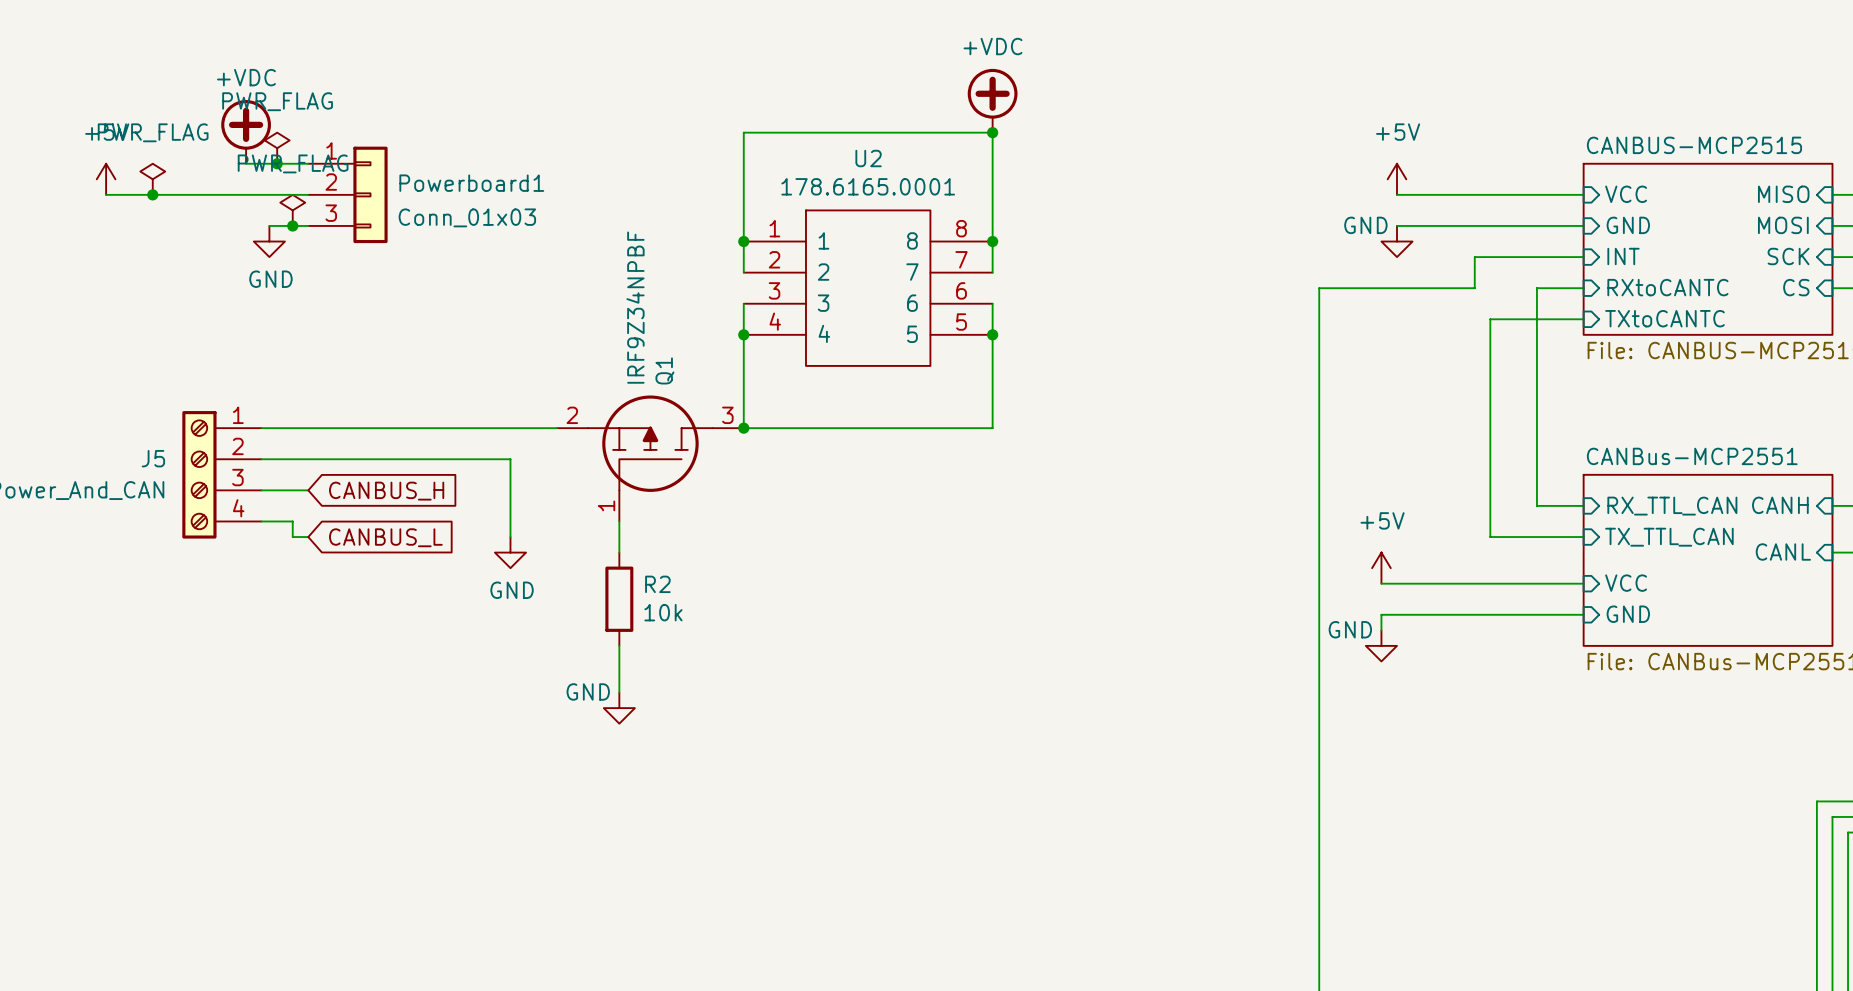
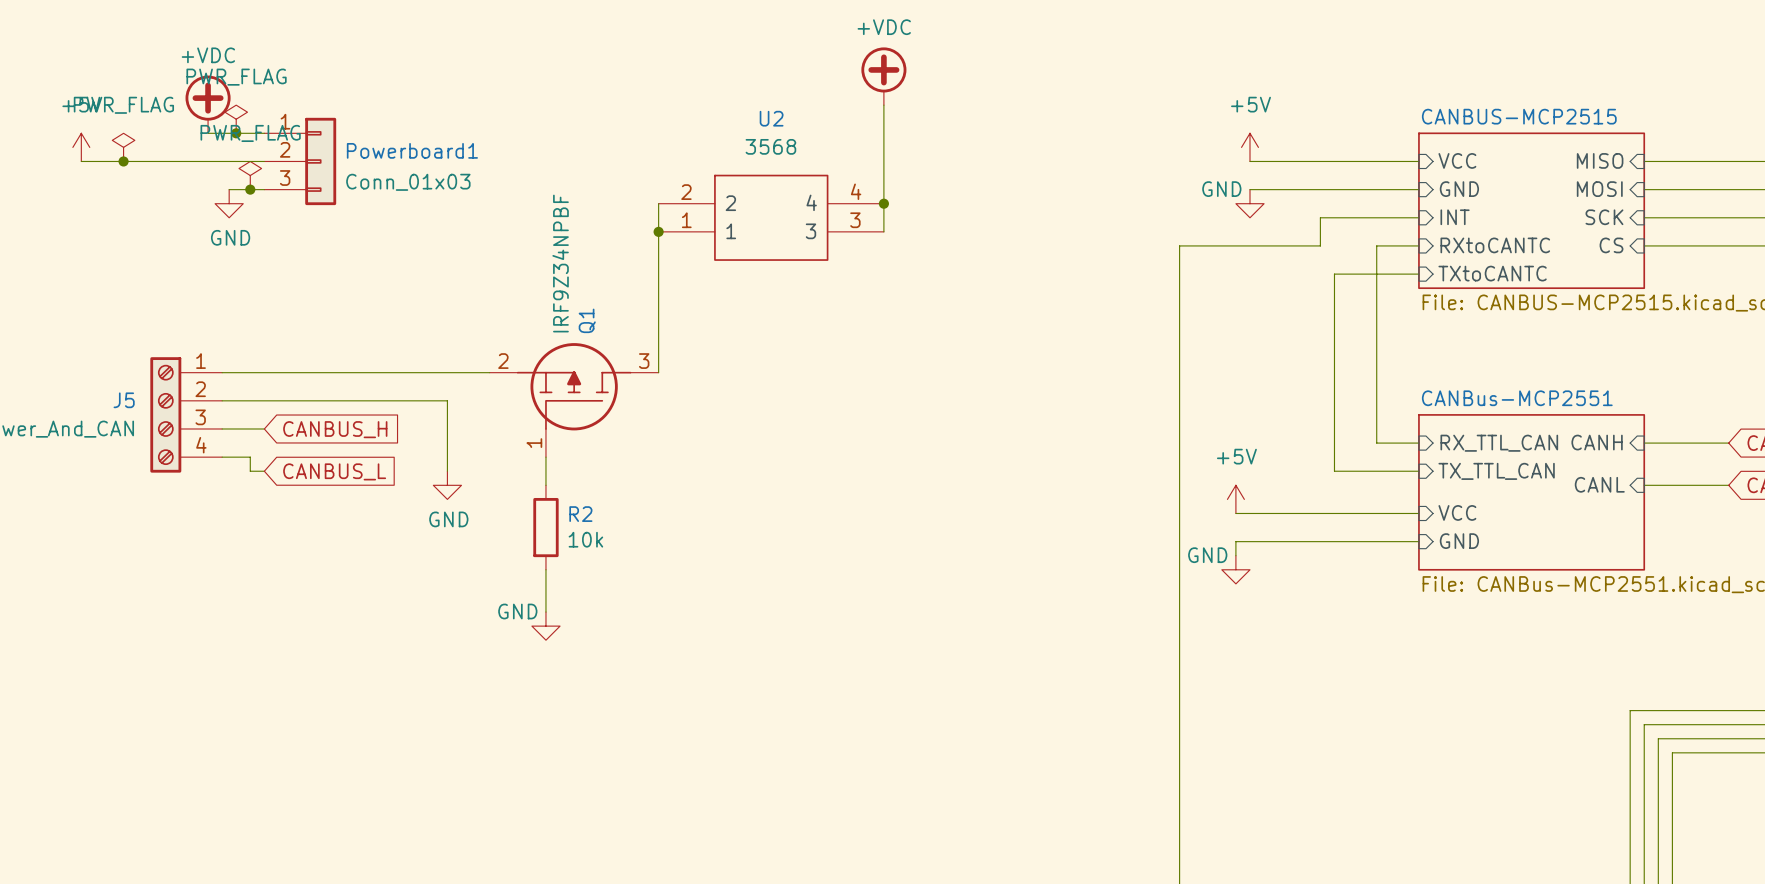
wire: (992, 132) (743, 132) (743, 241) -> none
junction: (992, 132) -> none
U2 value: 178.6165.0001 (868, 186) -> 3568 (770, 146)
U2 symbol: [743, 209, 993, 367] -> [658, 174, 884, 261]
junction: (743, 241) -> none
wire: none -> (658, 231) (658, 260)
junction: none -> (658, 231)
wire: (992, 303) (992, 428) (743, 428) -> none
junction: (743, 334) -> none
junction: (992, 334) -> none
junction: (743, 428) -> none

